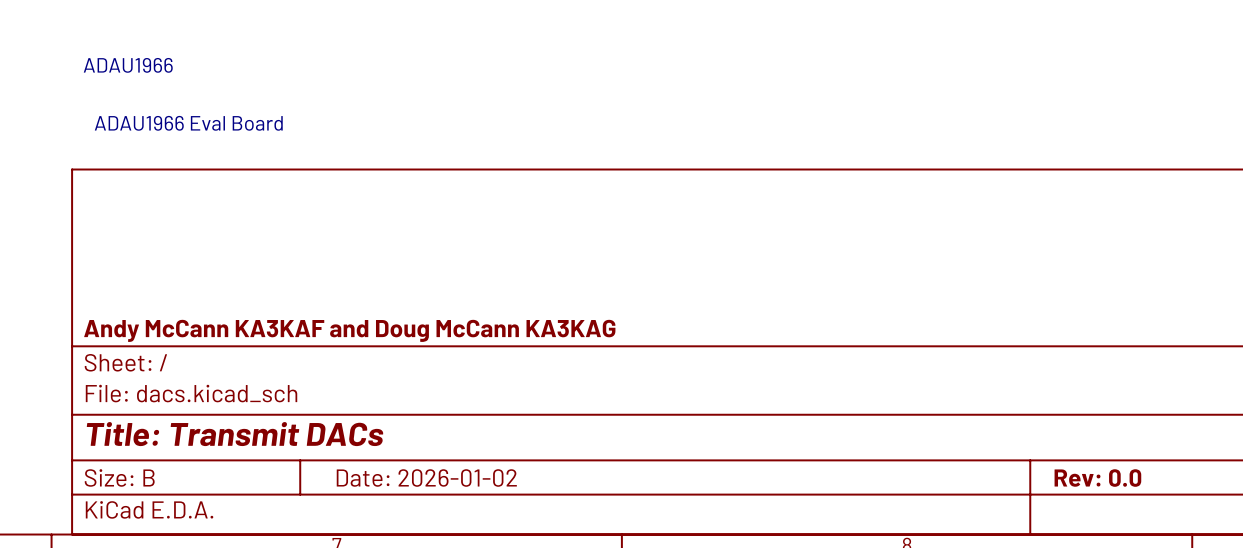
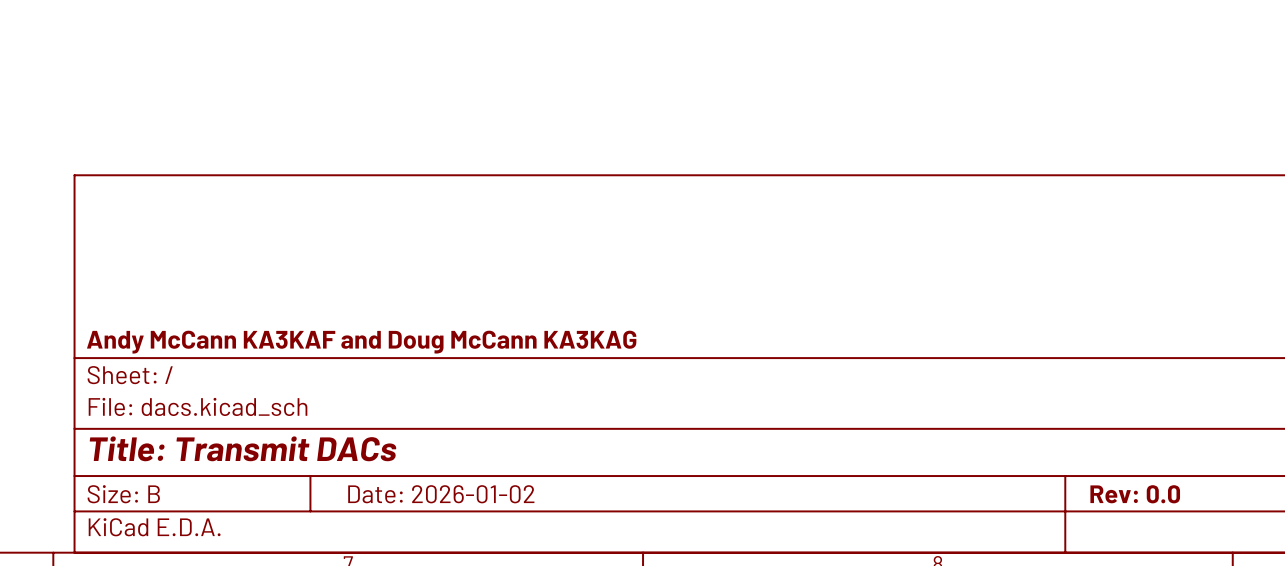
text: ADAU1966 (128, 65) -> none
text: ADAU1966 Eval Board (188, 123) -> none

